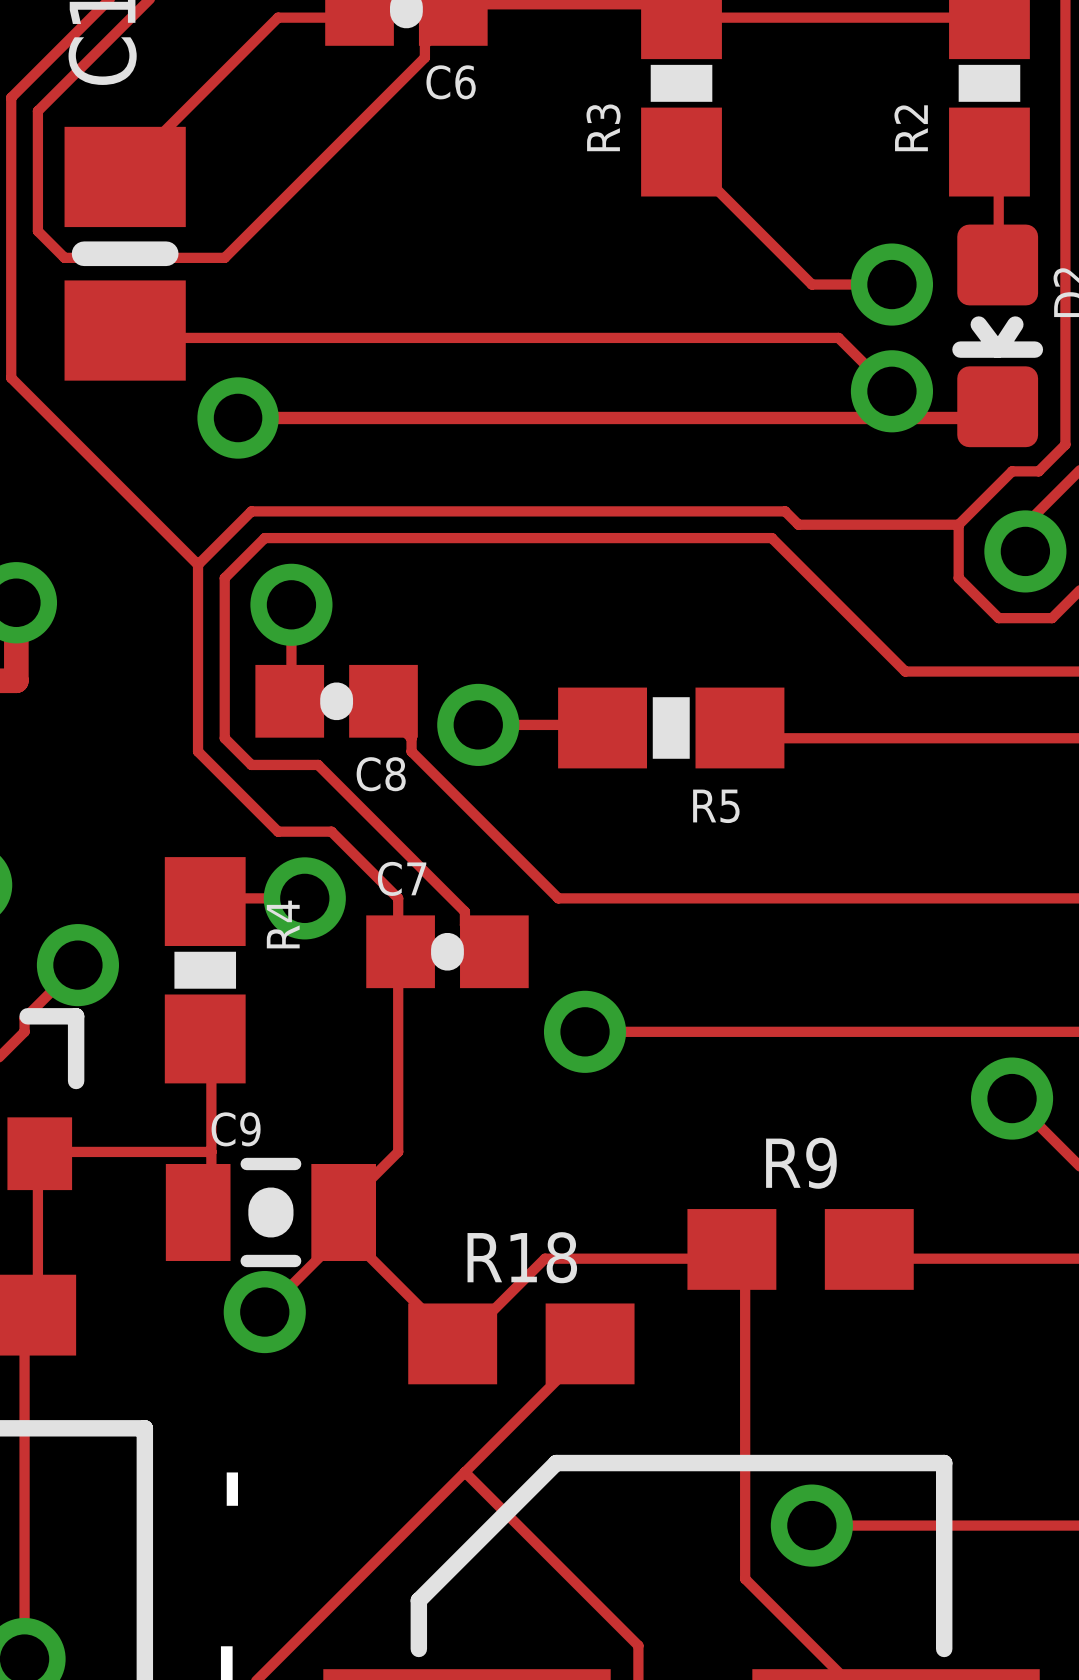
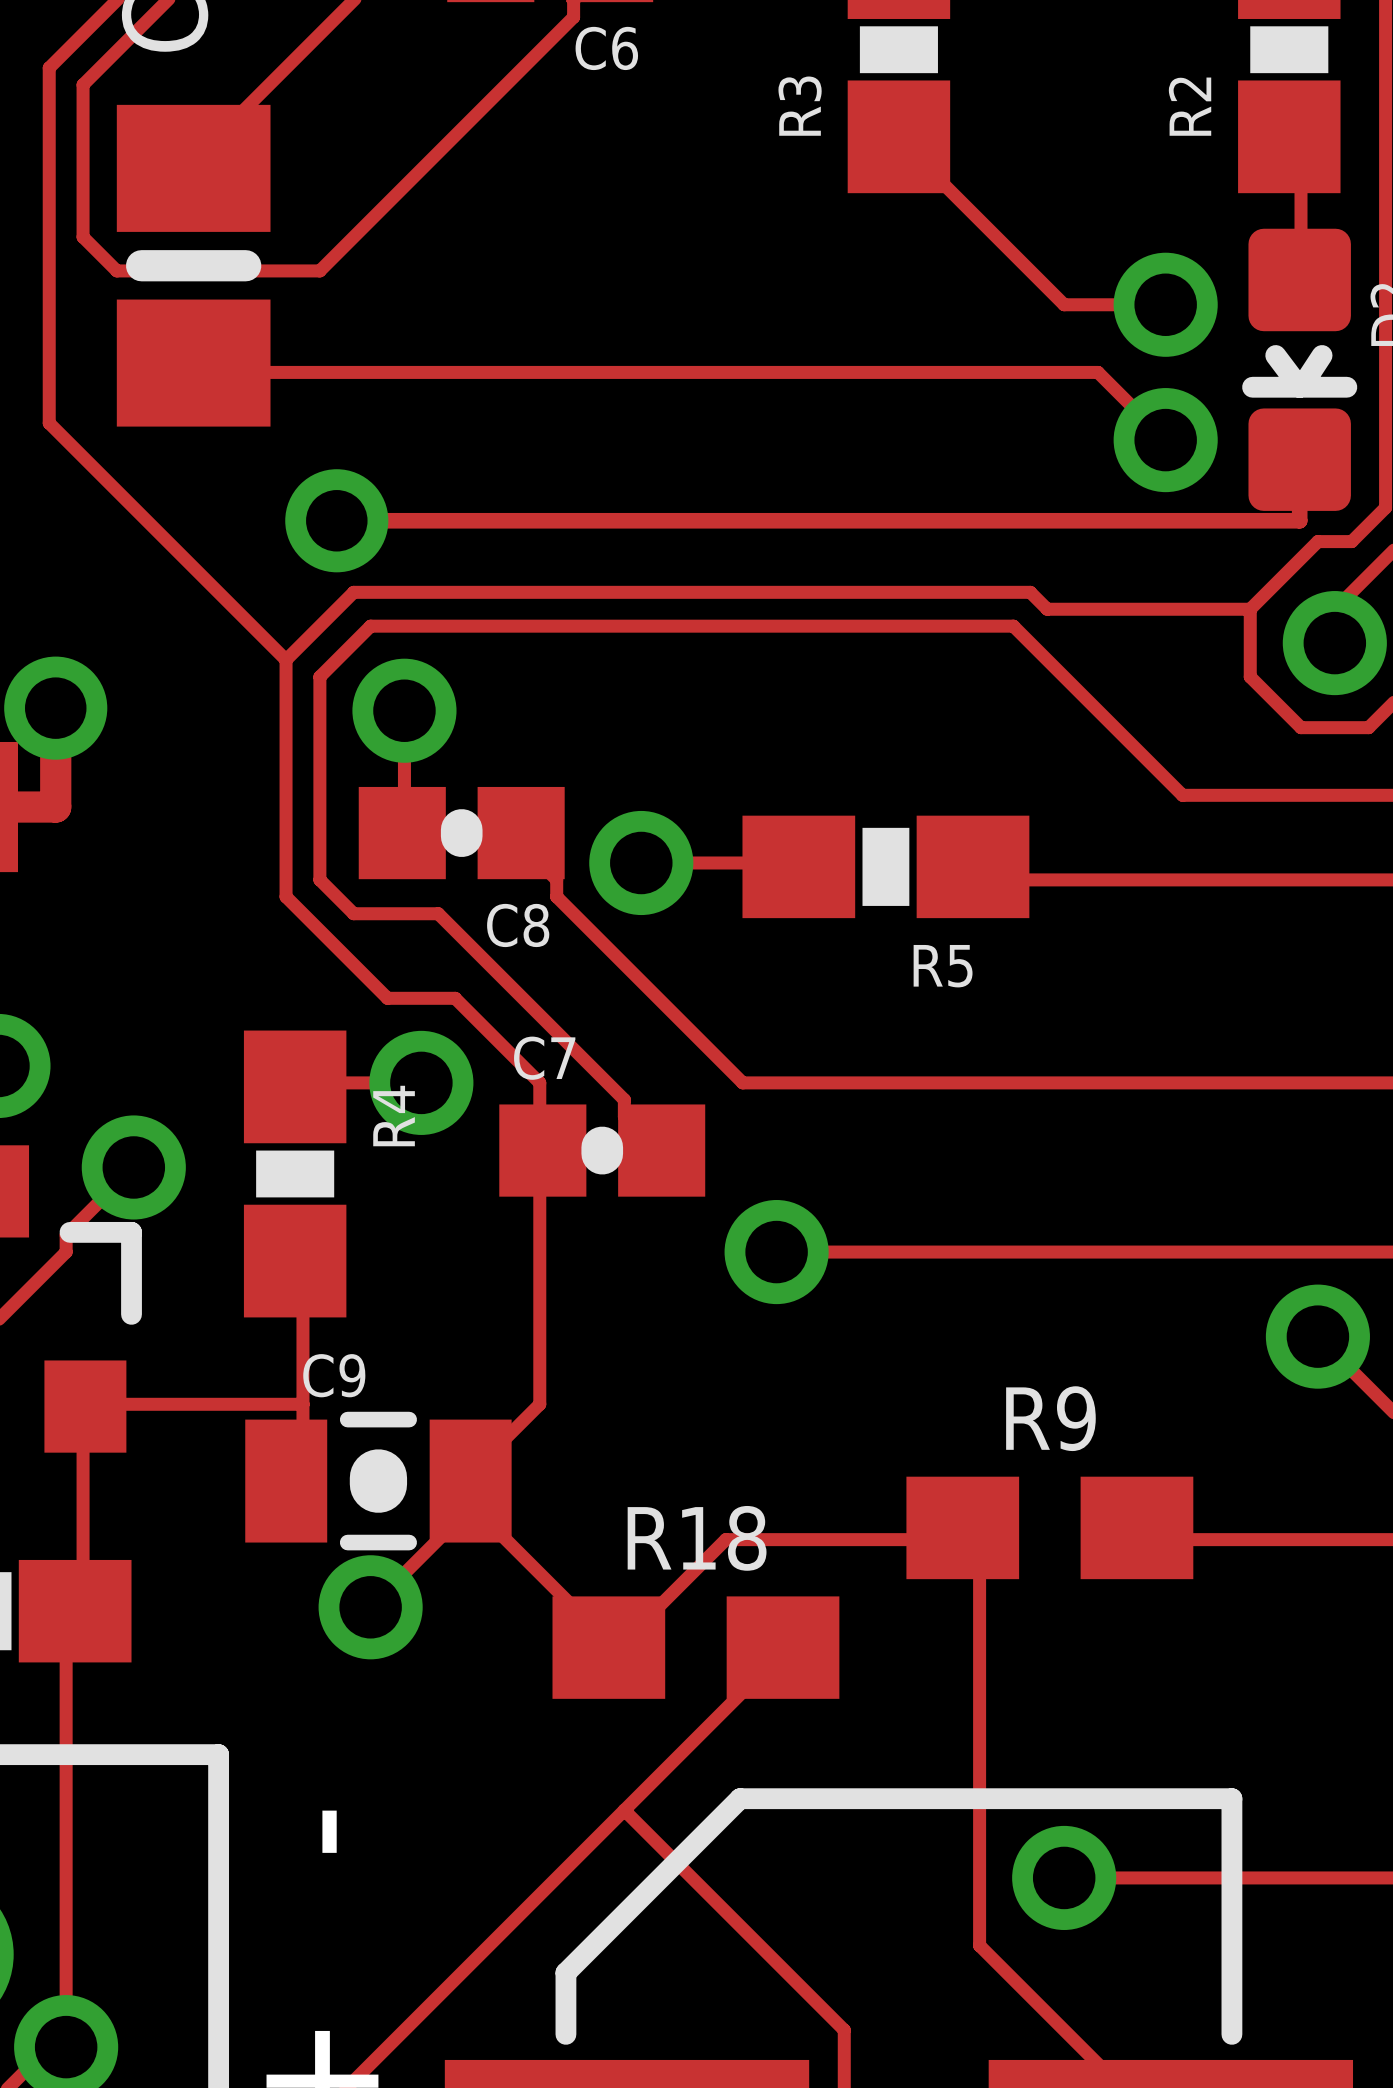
track: (238, 417) (997, 417) -> (336, 520) (1299, 520) (1299, 473)
via position: (238, 417) -> (336, 520)

